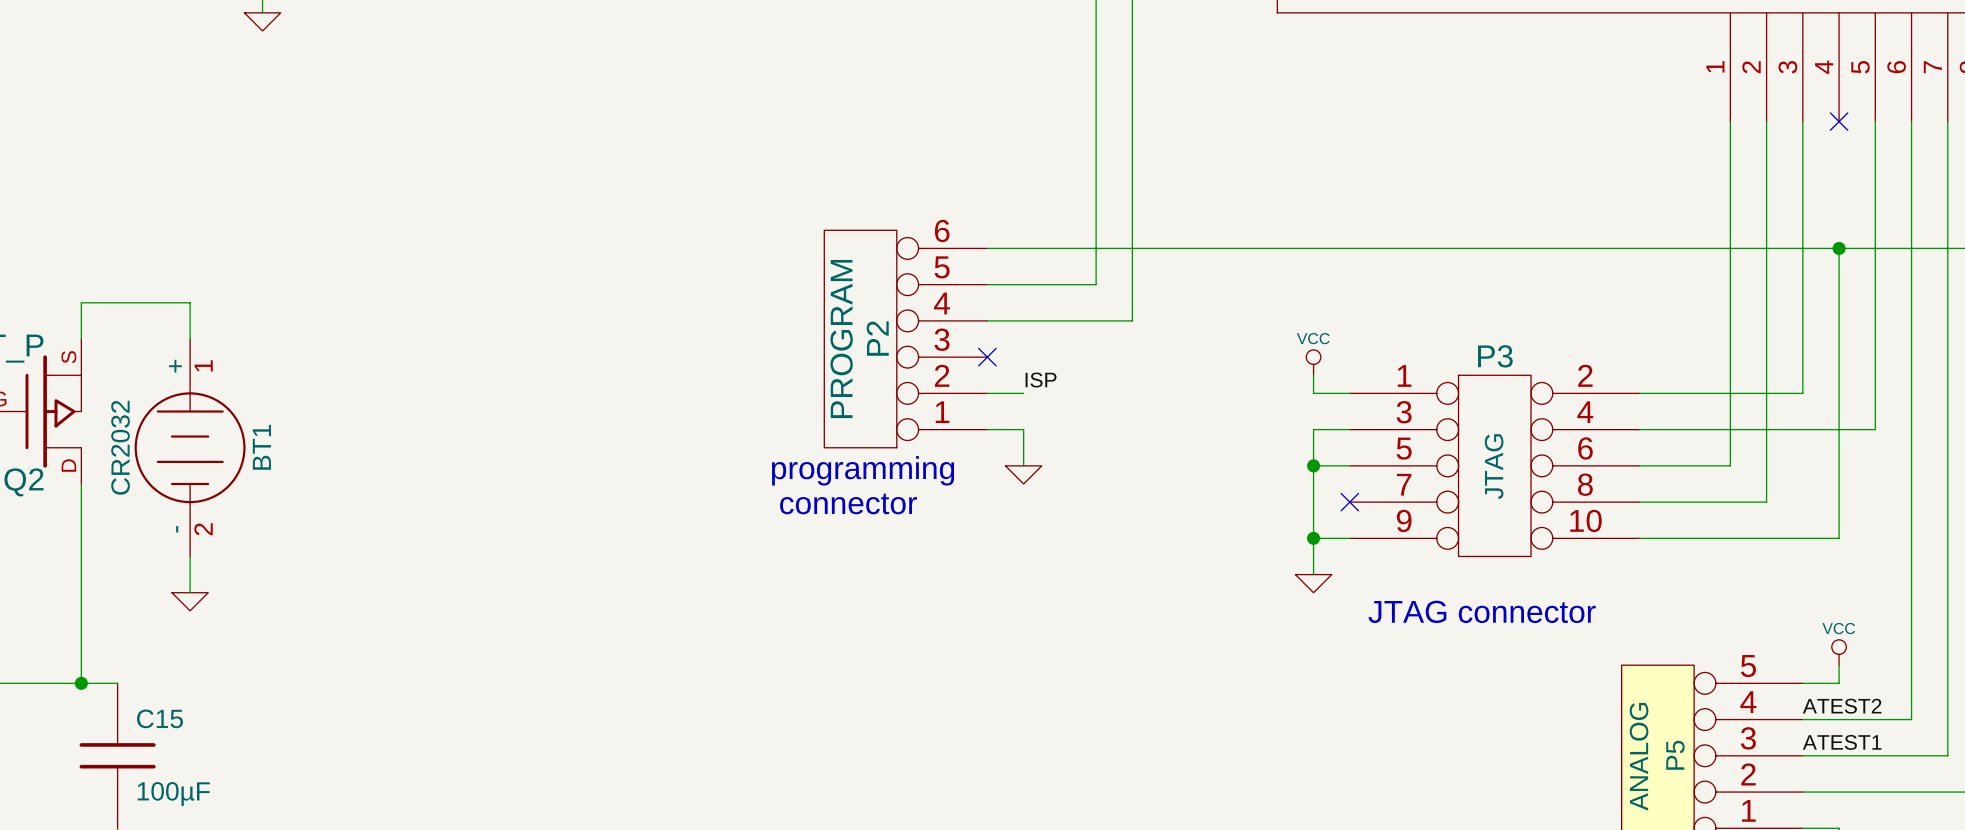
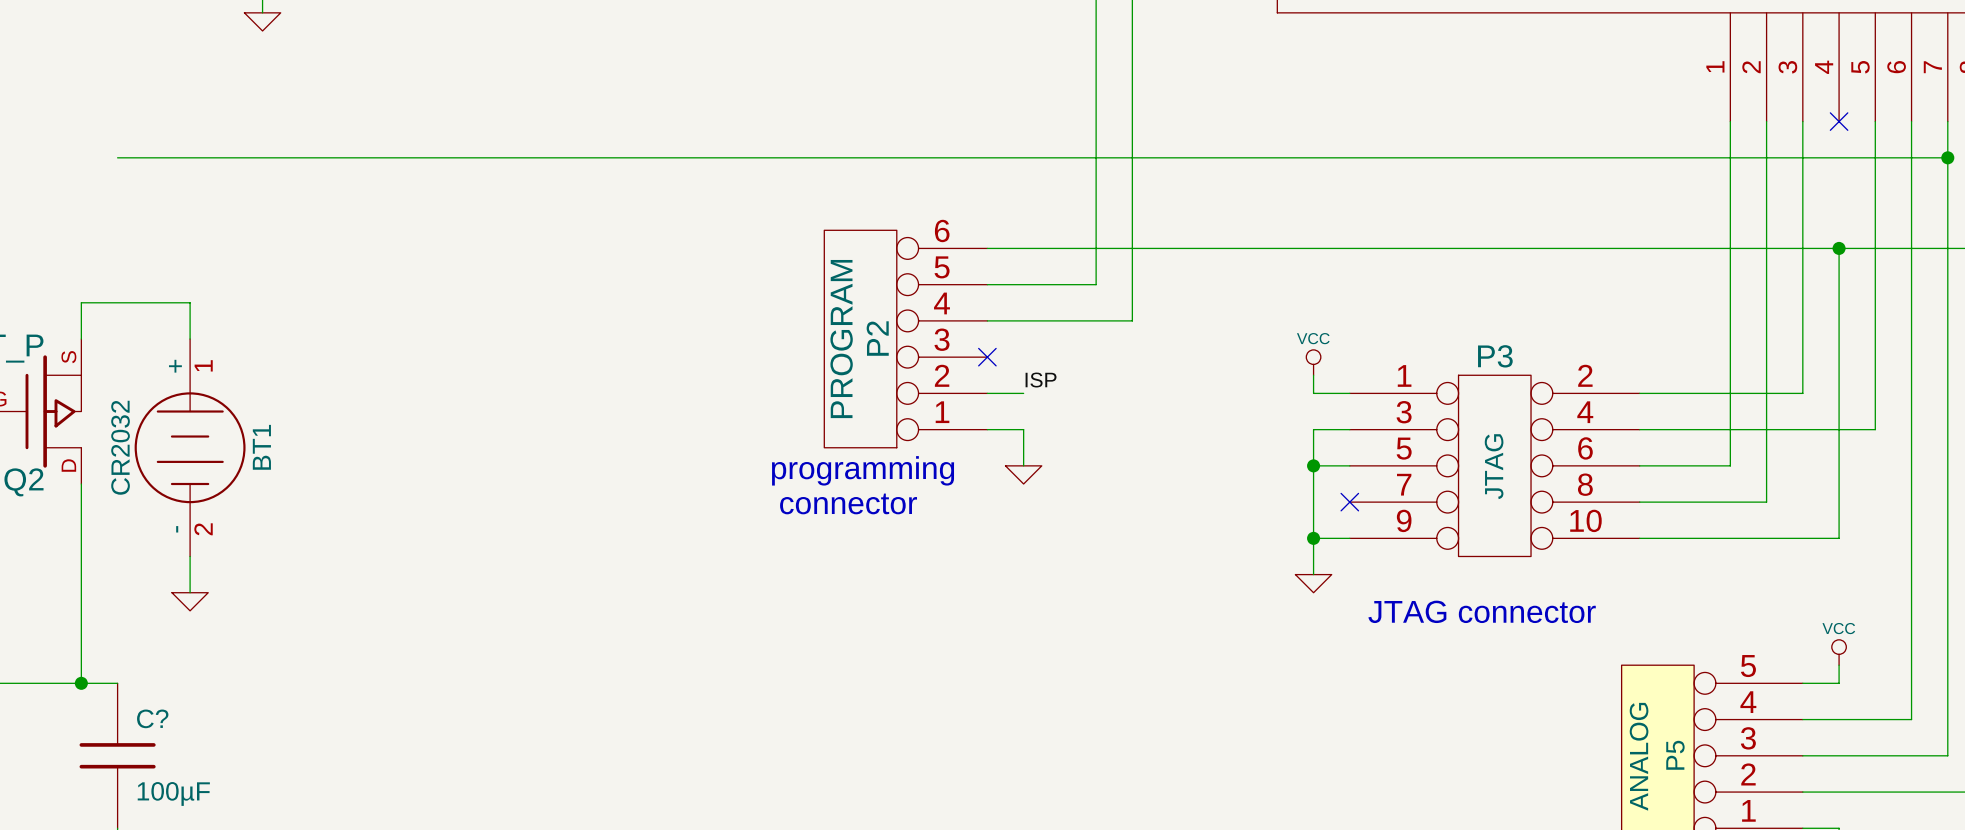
wire: none -> (117, 157) (1947, 157)
junction: none -> (1947, 157)
label: ATEST2 (1842, 706) -> none
C15 name: C15 (159, 718) -> C? (152, 718)
label: ATEST1 (1842, 742) -> none

